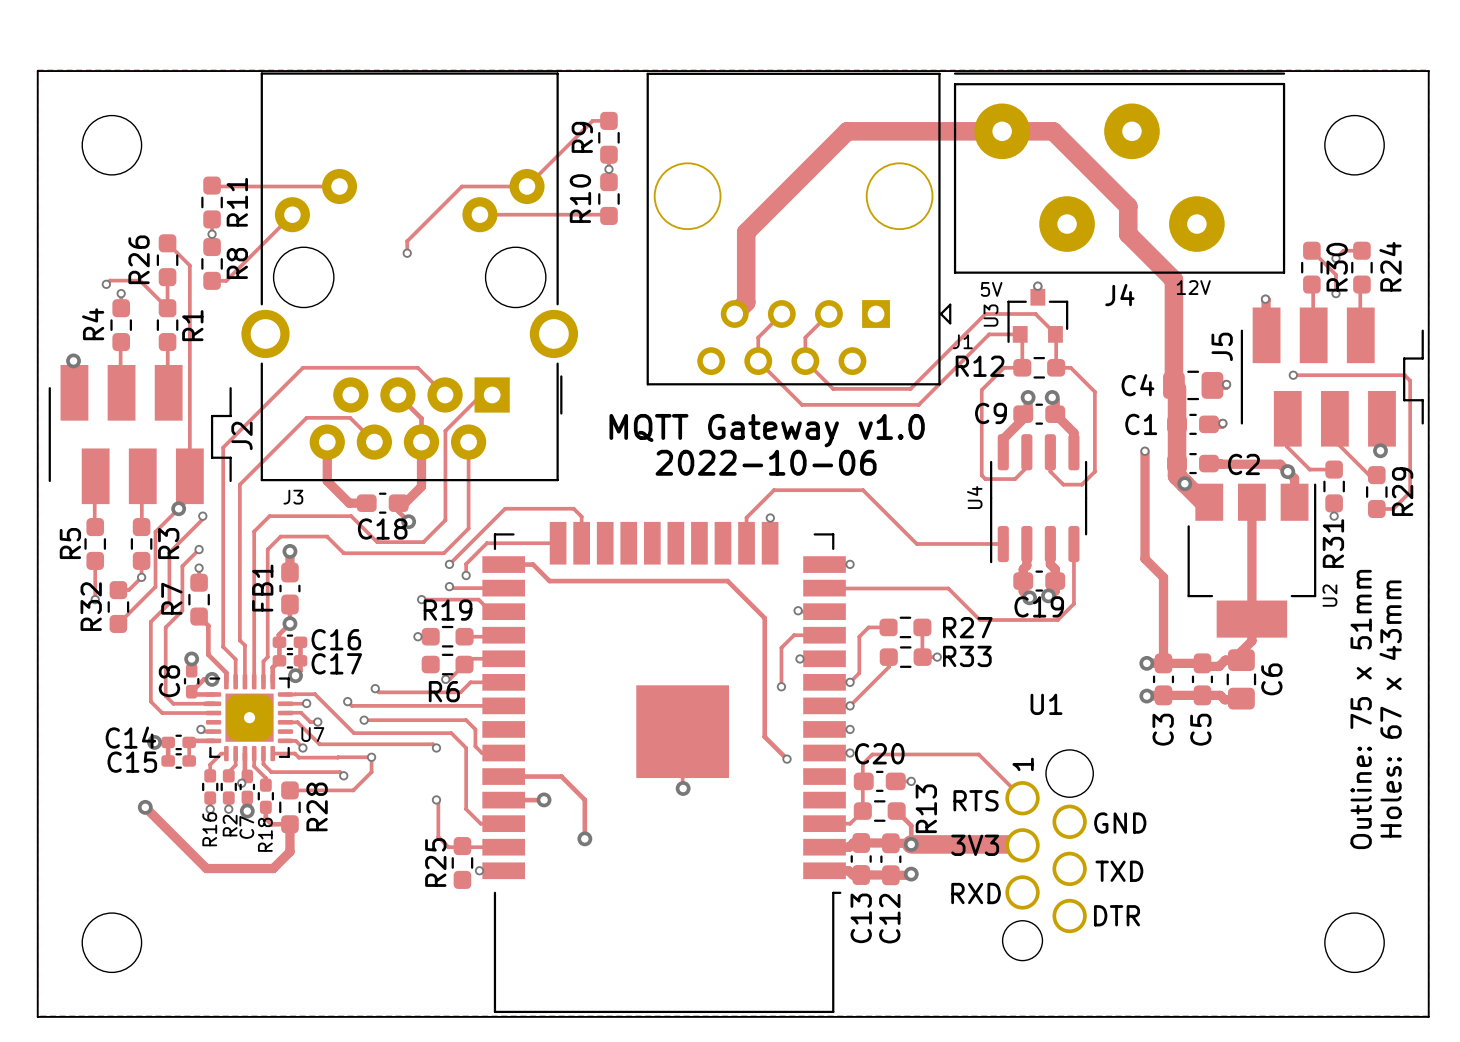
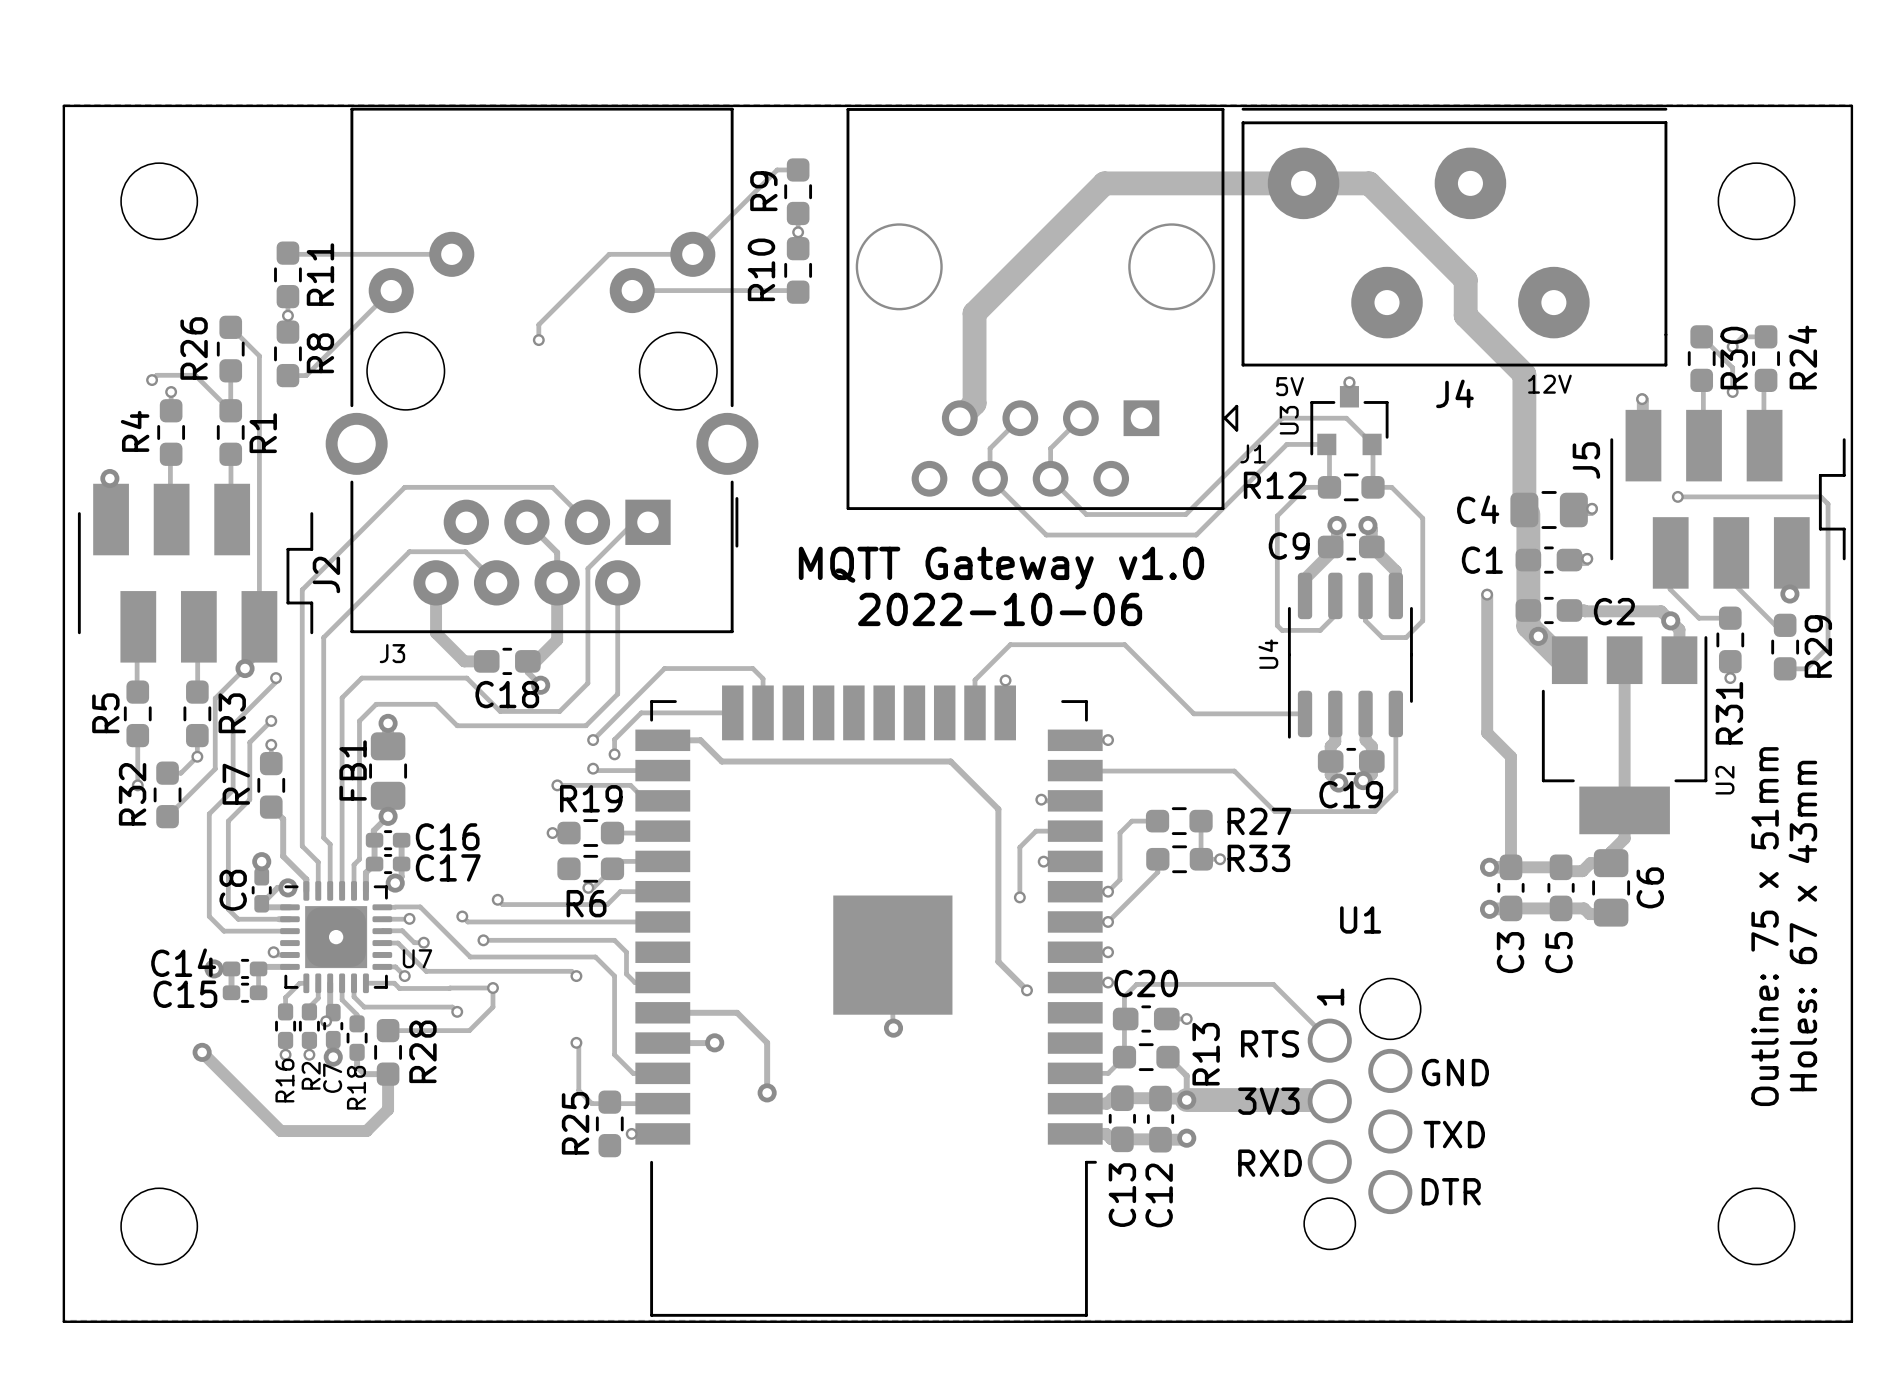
FB1 footprint: [279, 562, 301, 615] -> [369, 732, 408, 810]

